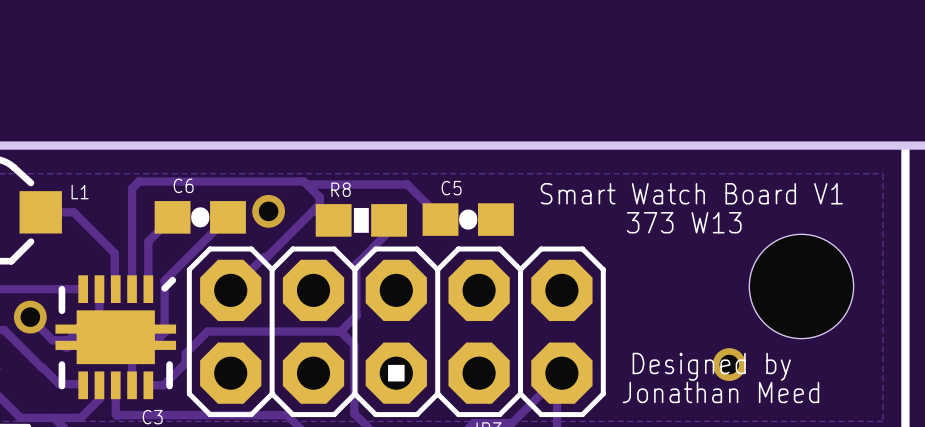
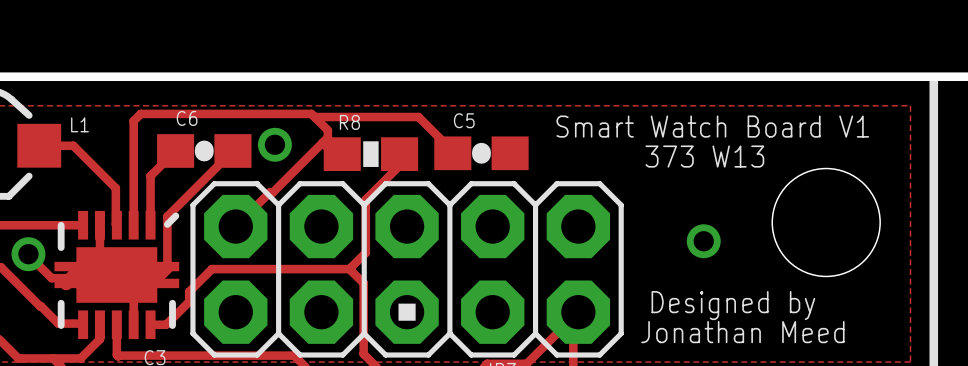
via position: (729, 364) -> (703, 241)

